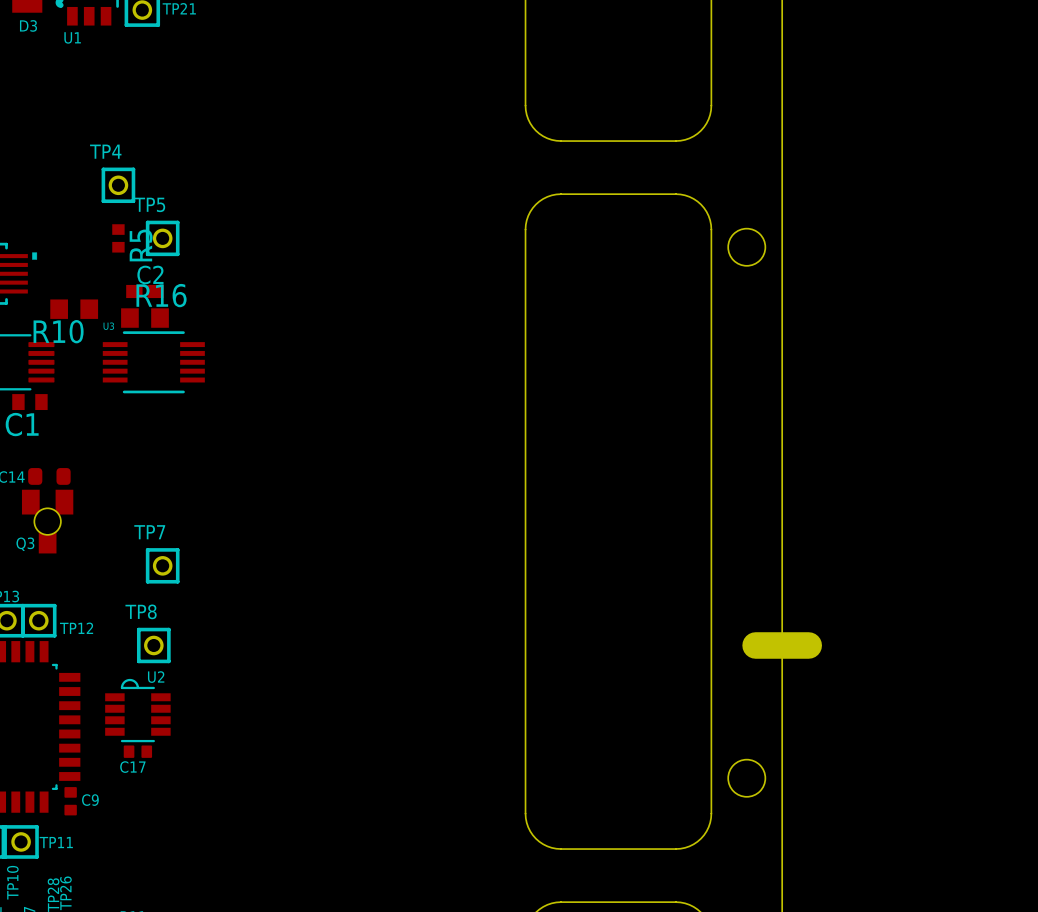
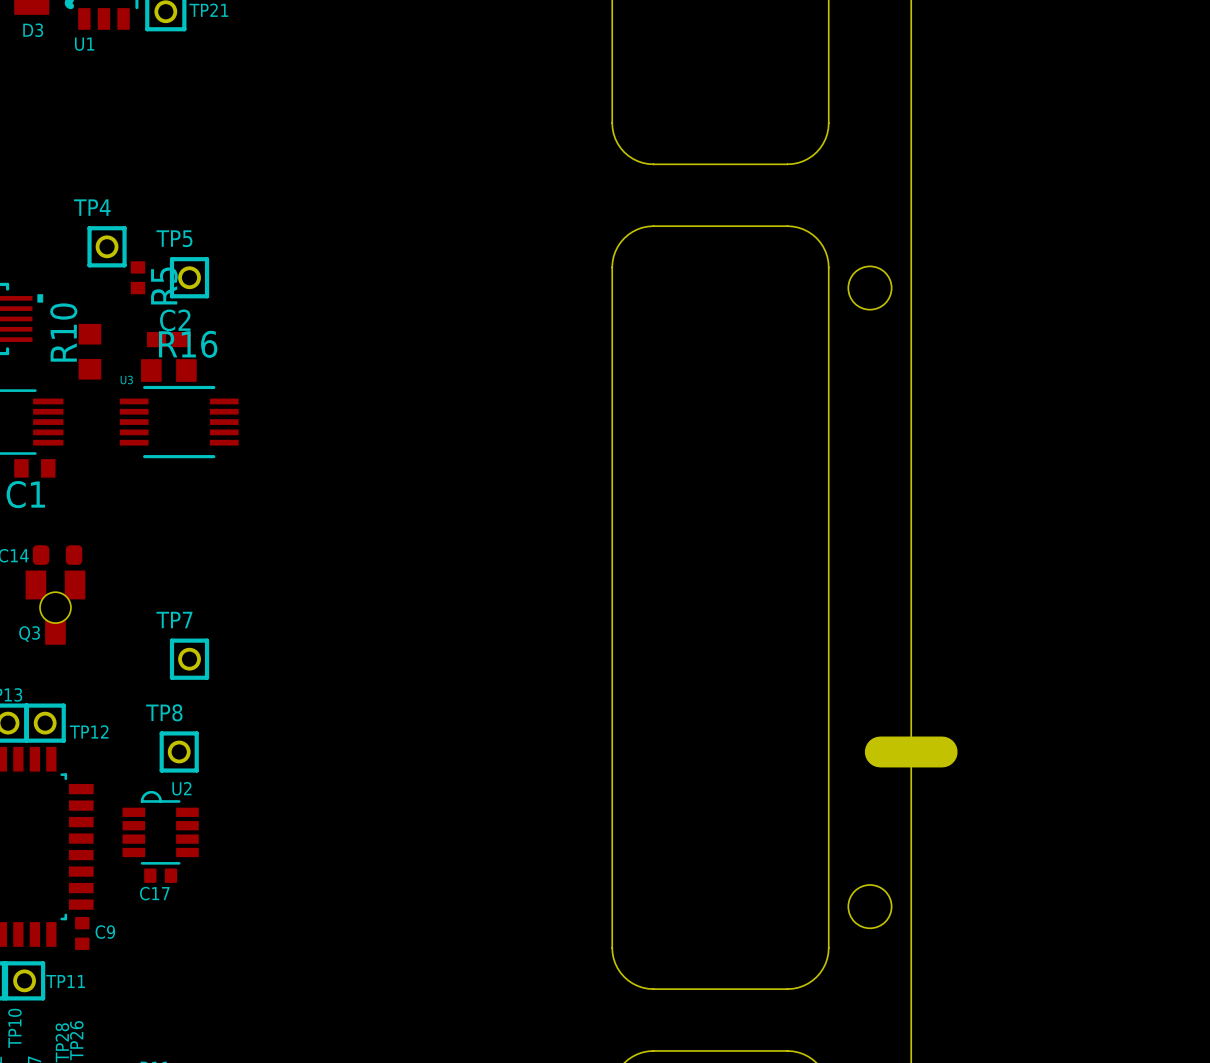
TP4 position: (118, 185) -> (107, 246)
R10 rotation: 0° (74, 309) -> 90° clockwise (89, 351)

